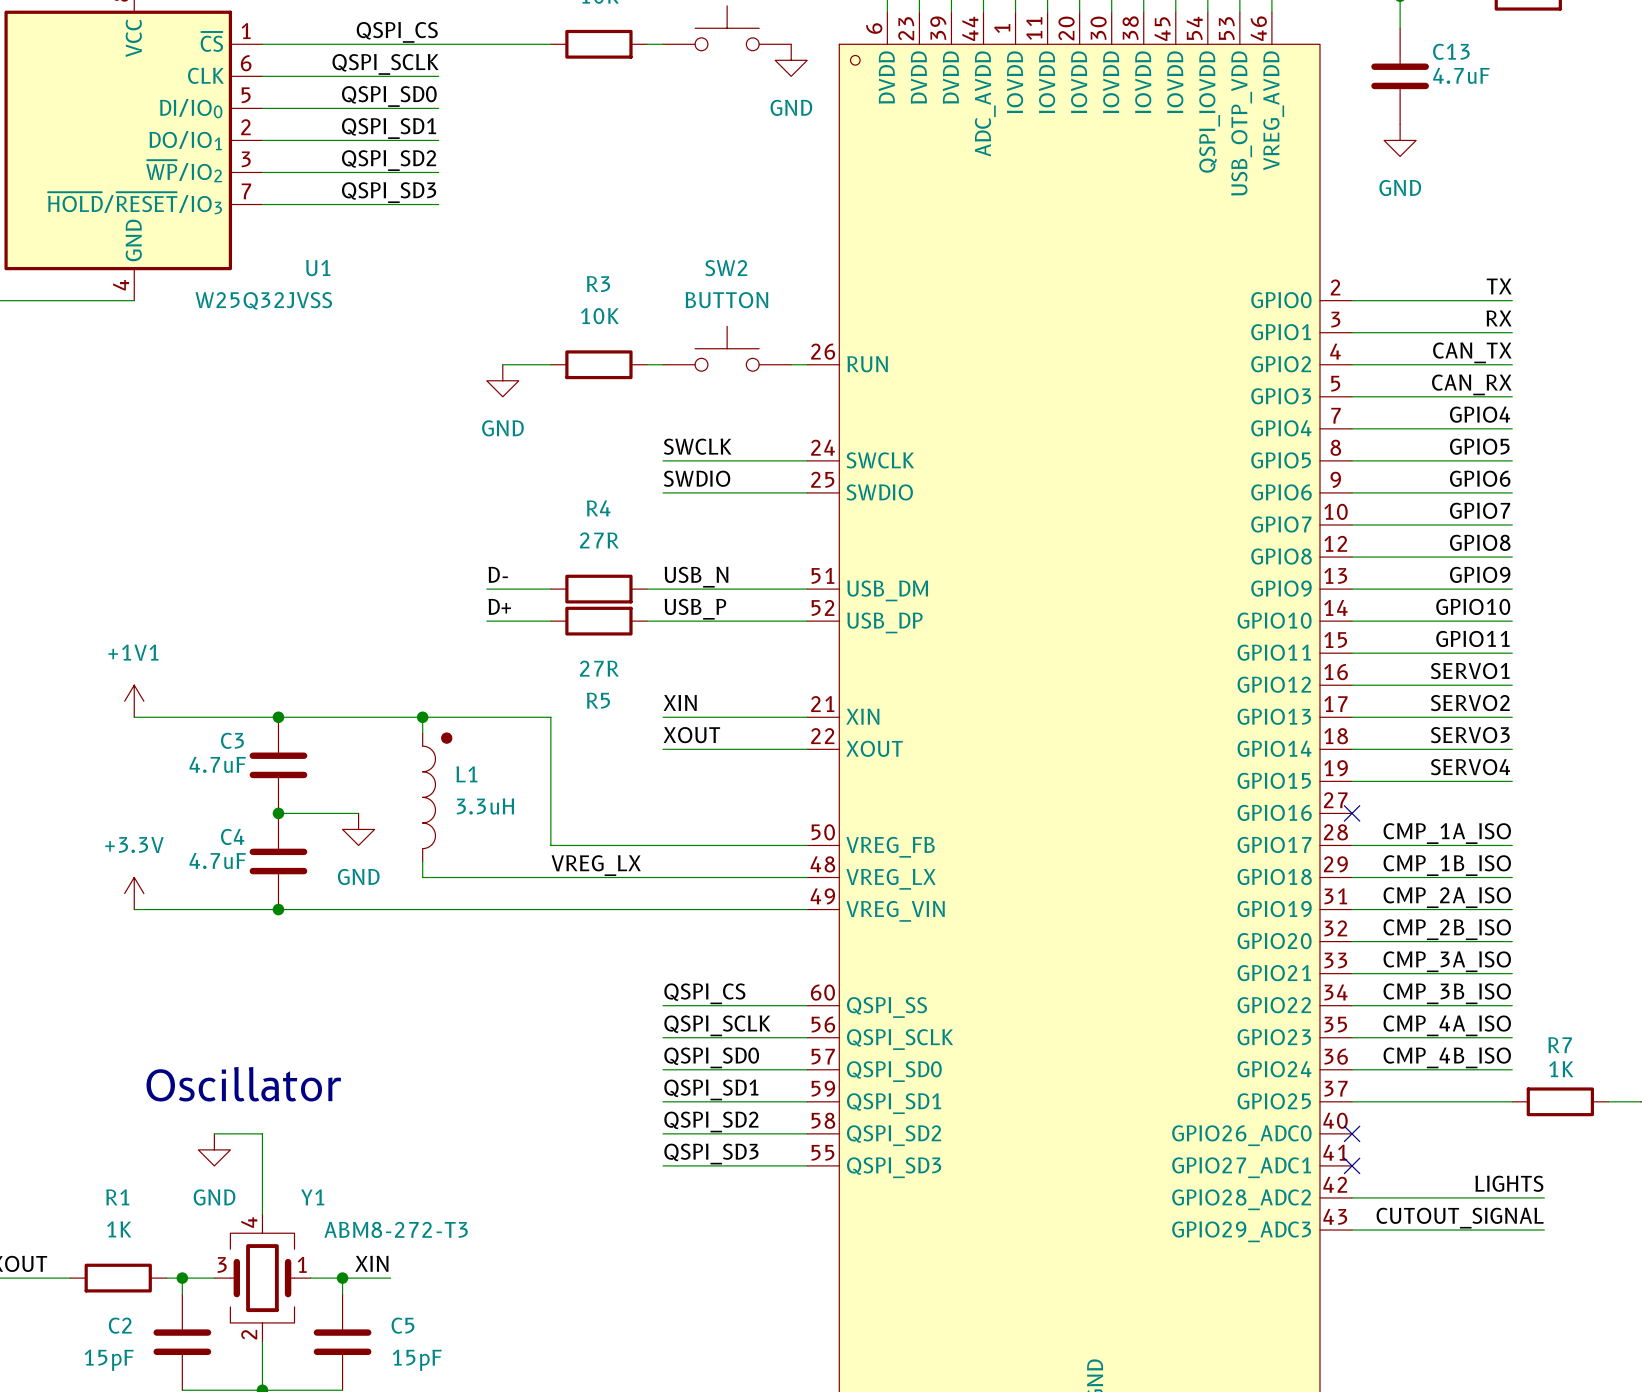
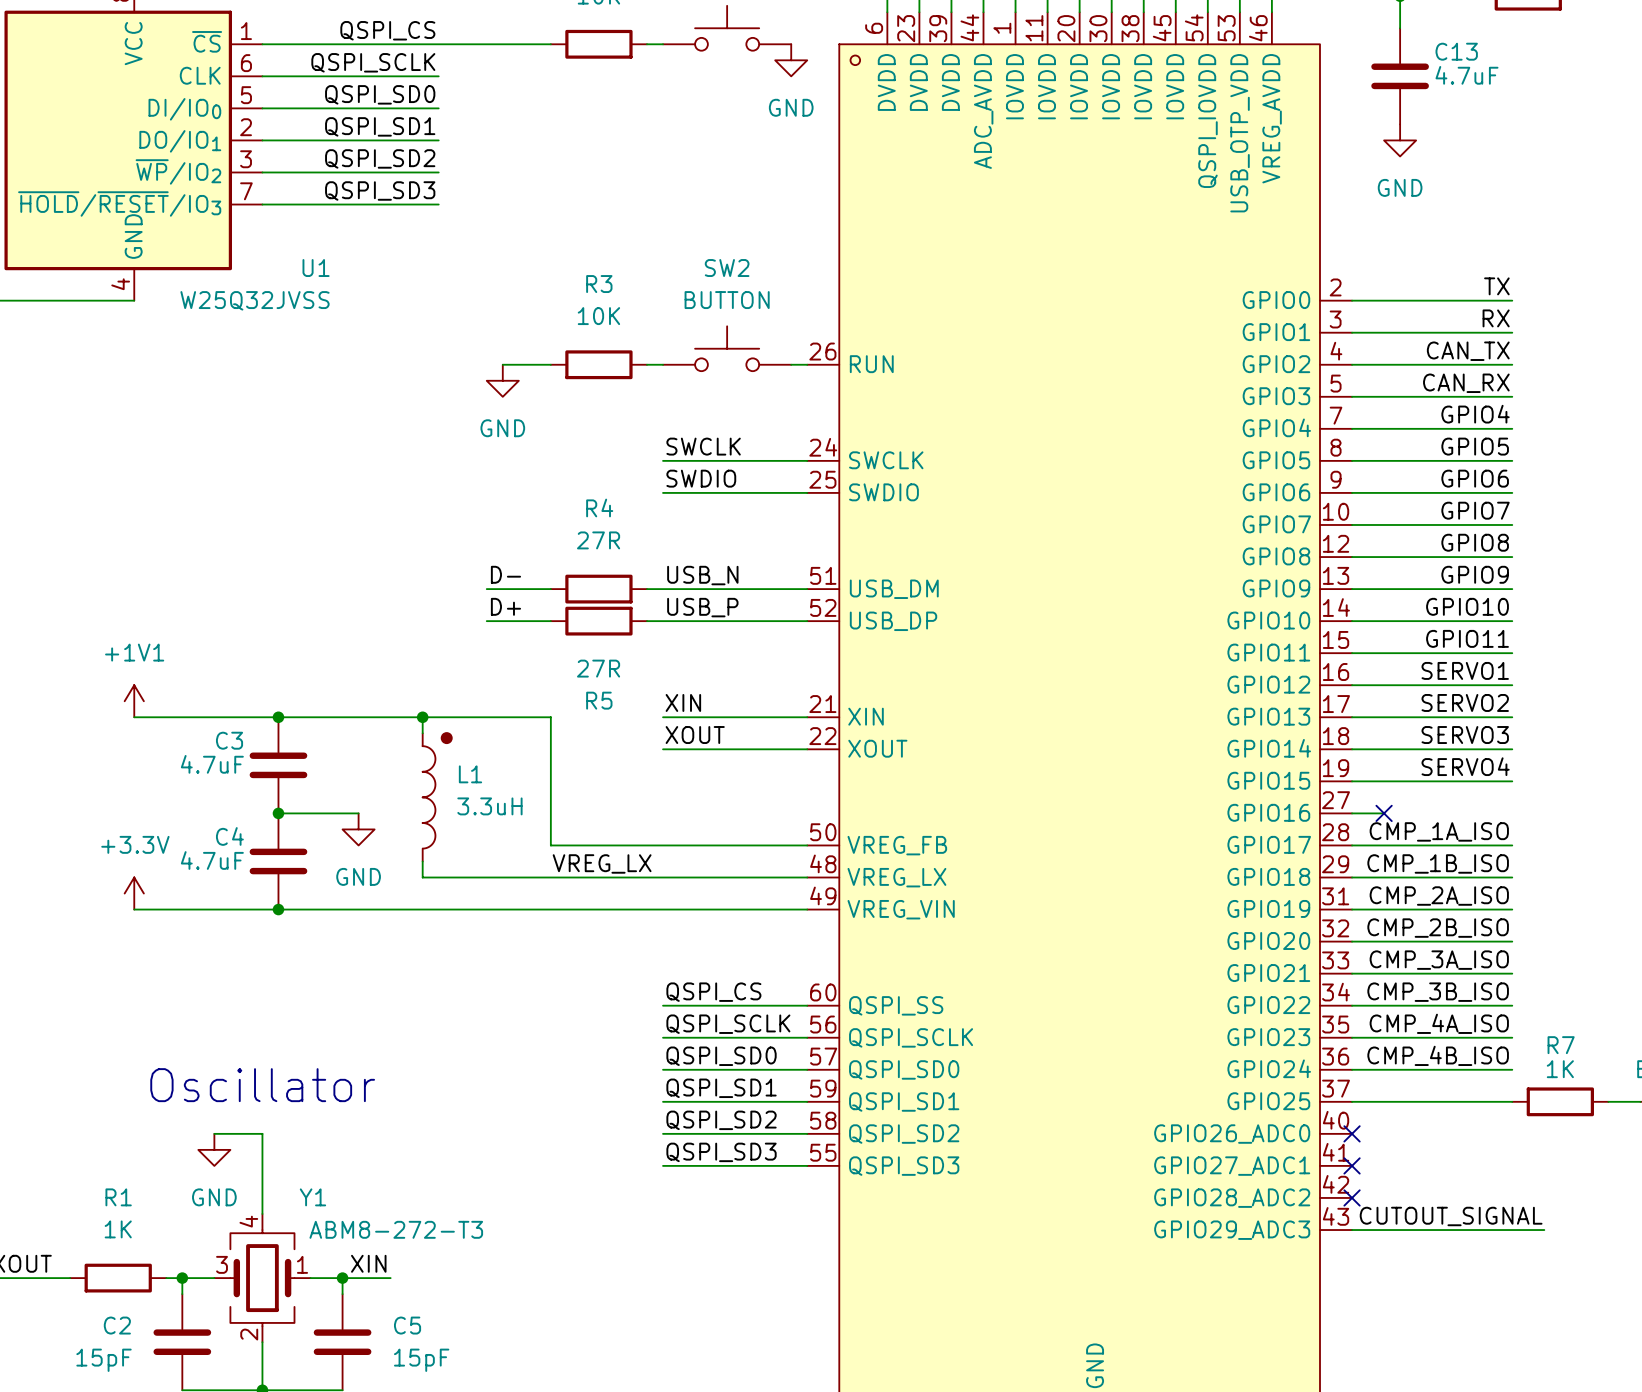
wire: none -> (1352, 813) (1384, 813)
no-connect mark position: (1352, 813) -> (1384, 813)
label: LIGHTS (1509, 1183) -> none
wire: (1352, 1197) (1544, 1197) -> none
no-connect mark: none -> (1352, 1197)

